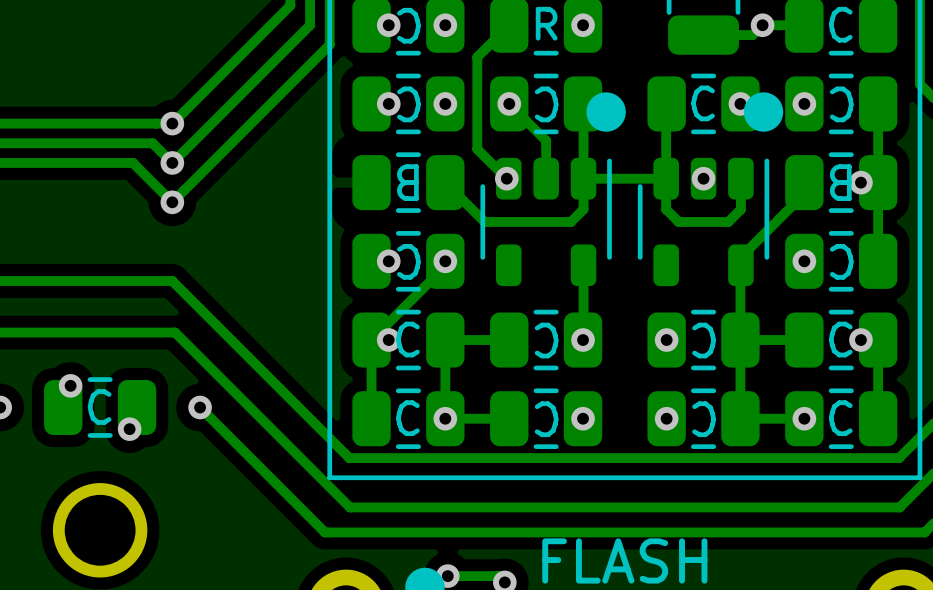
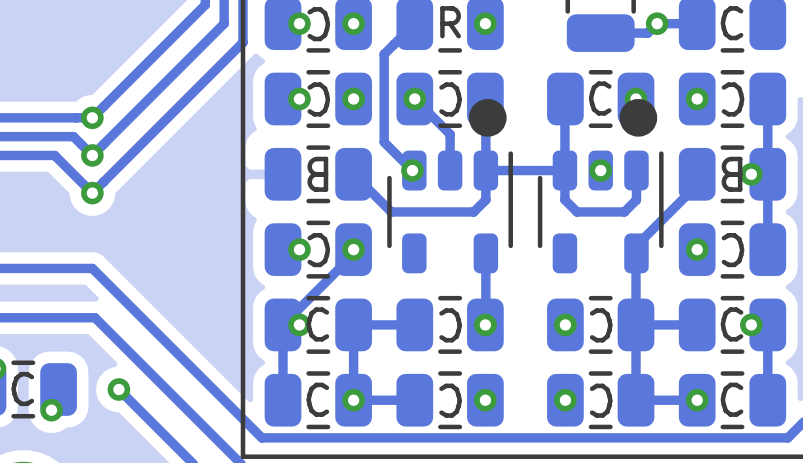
part footprint: [480, 92, 626, 287] -> [387, 98, 513, 274]
part footprint: [637, 92, 784, 287] -> [537, 98, 664, 274]

